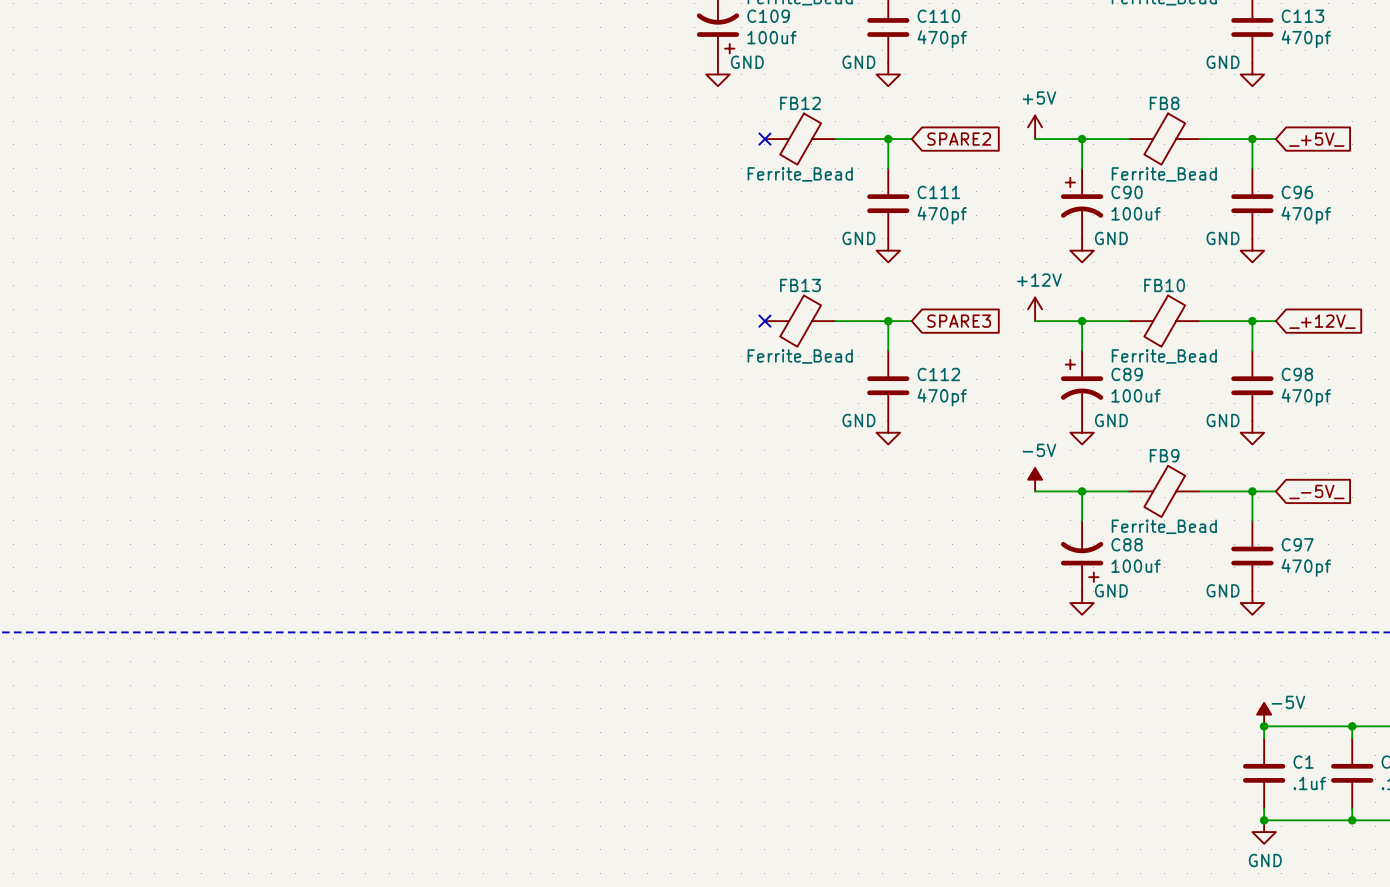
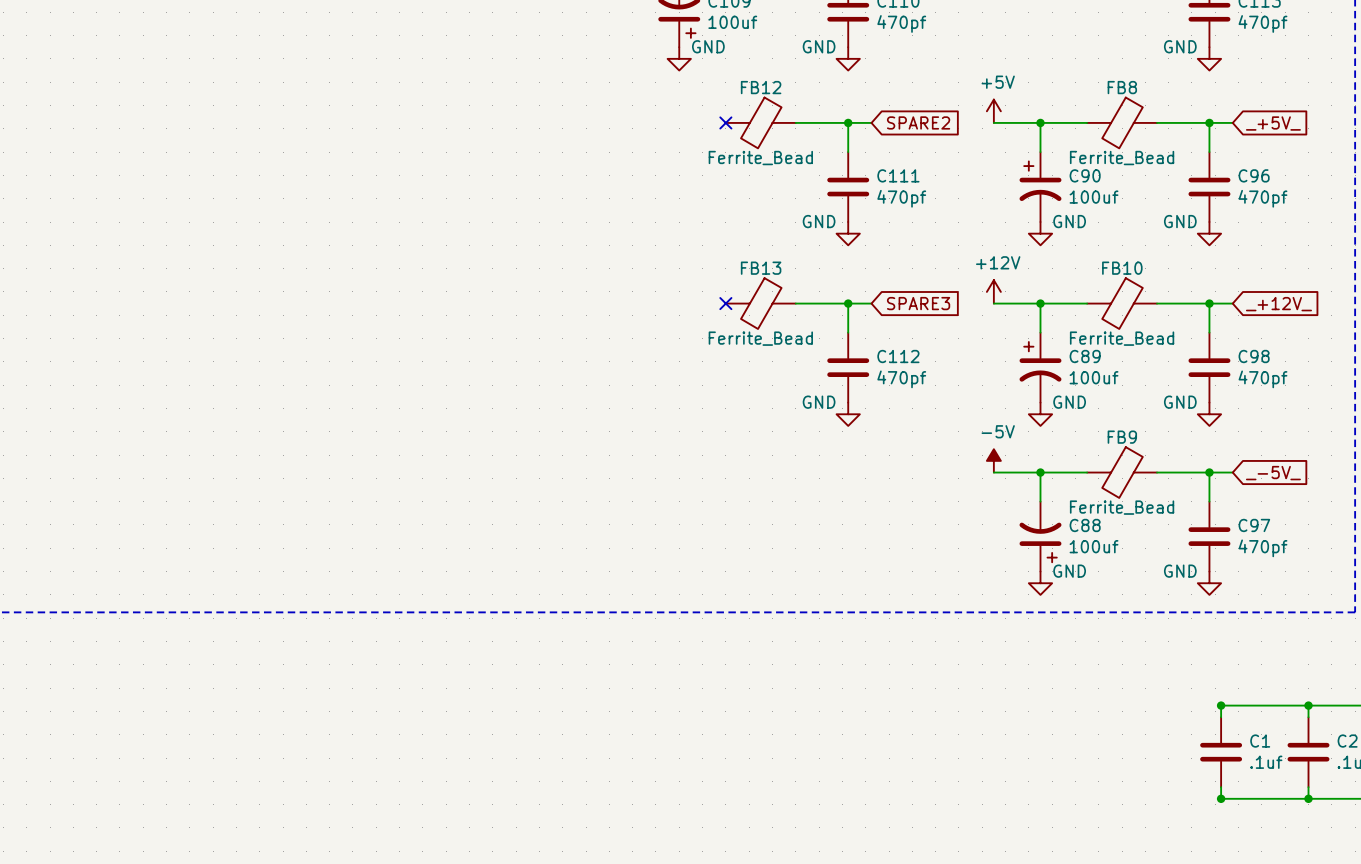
power symbol: -5V (1264, 714) -> none
power symbol: GND (1264, 832) -> none

